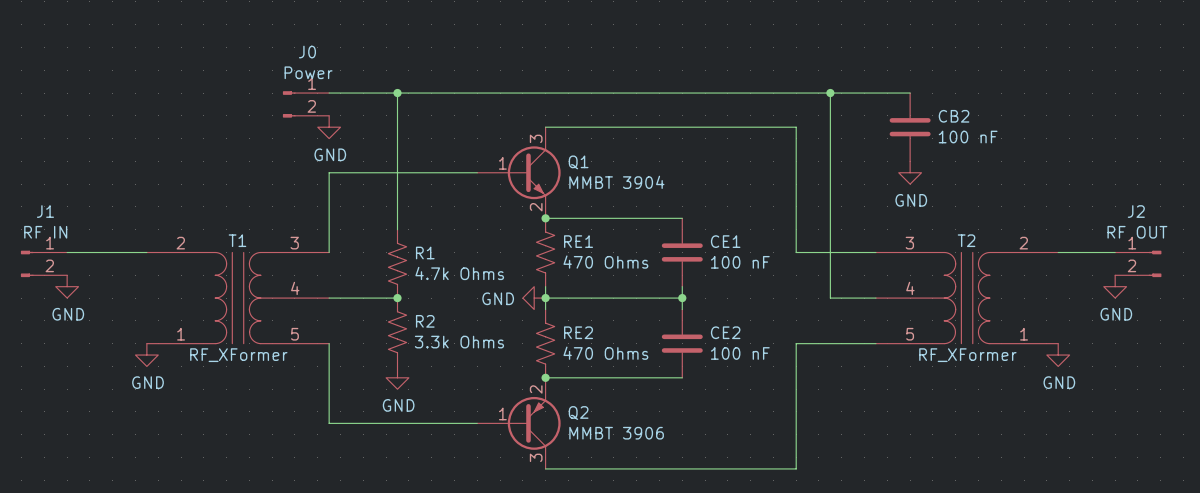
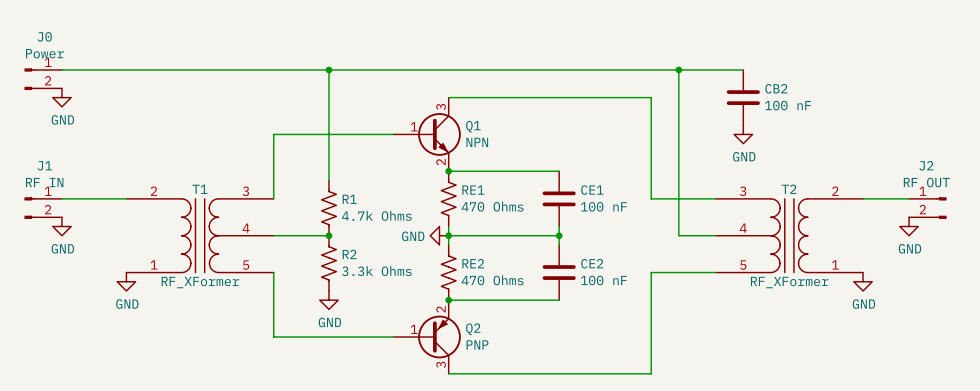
wire: none -> (61, 69) (273, 69)
J0 position: (306, 104) -> (43, 79)
power symbol: none -> GND (61, 97)
power symbol: GND (329, 127) -> none
Q1 value: MMBT 3904 (616, 182) -> NPN (477, 142)
Q2 value: MMBT 3906 (616, 433) -> PNP (477, 344)

